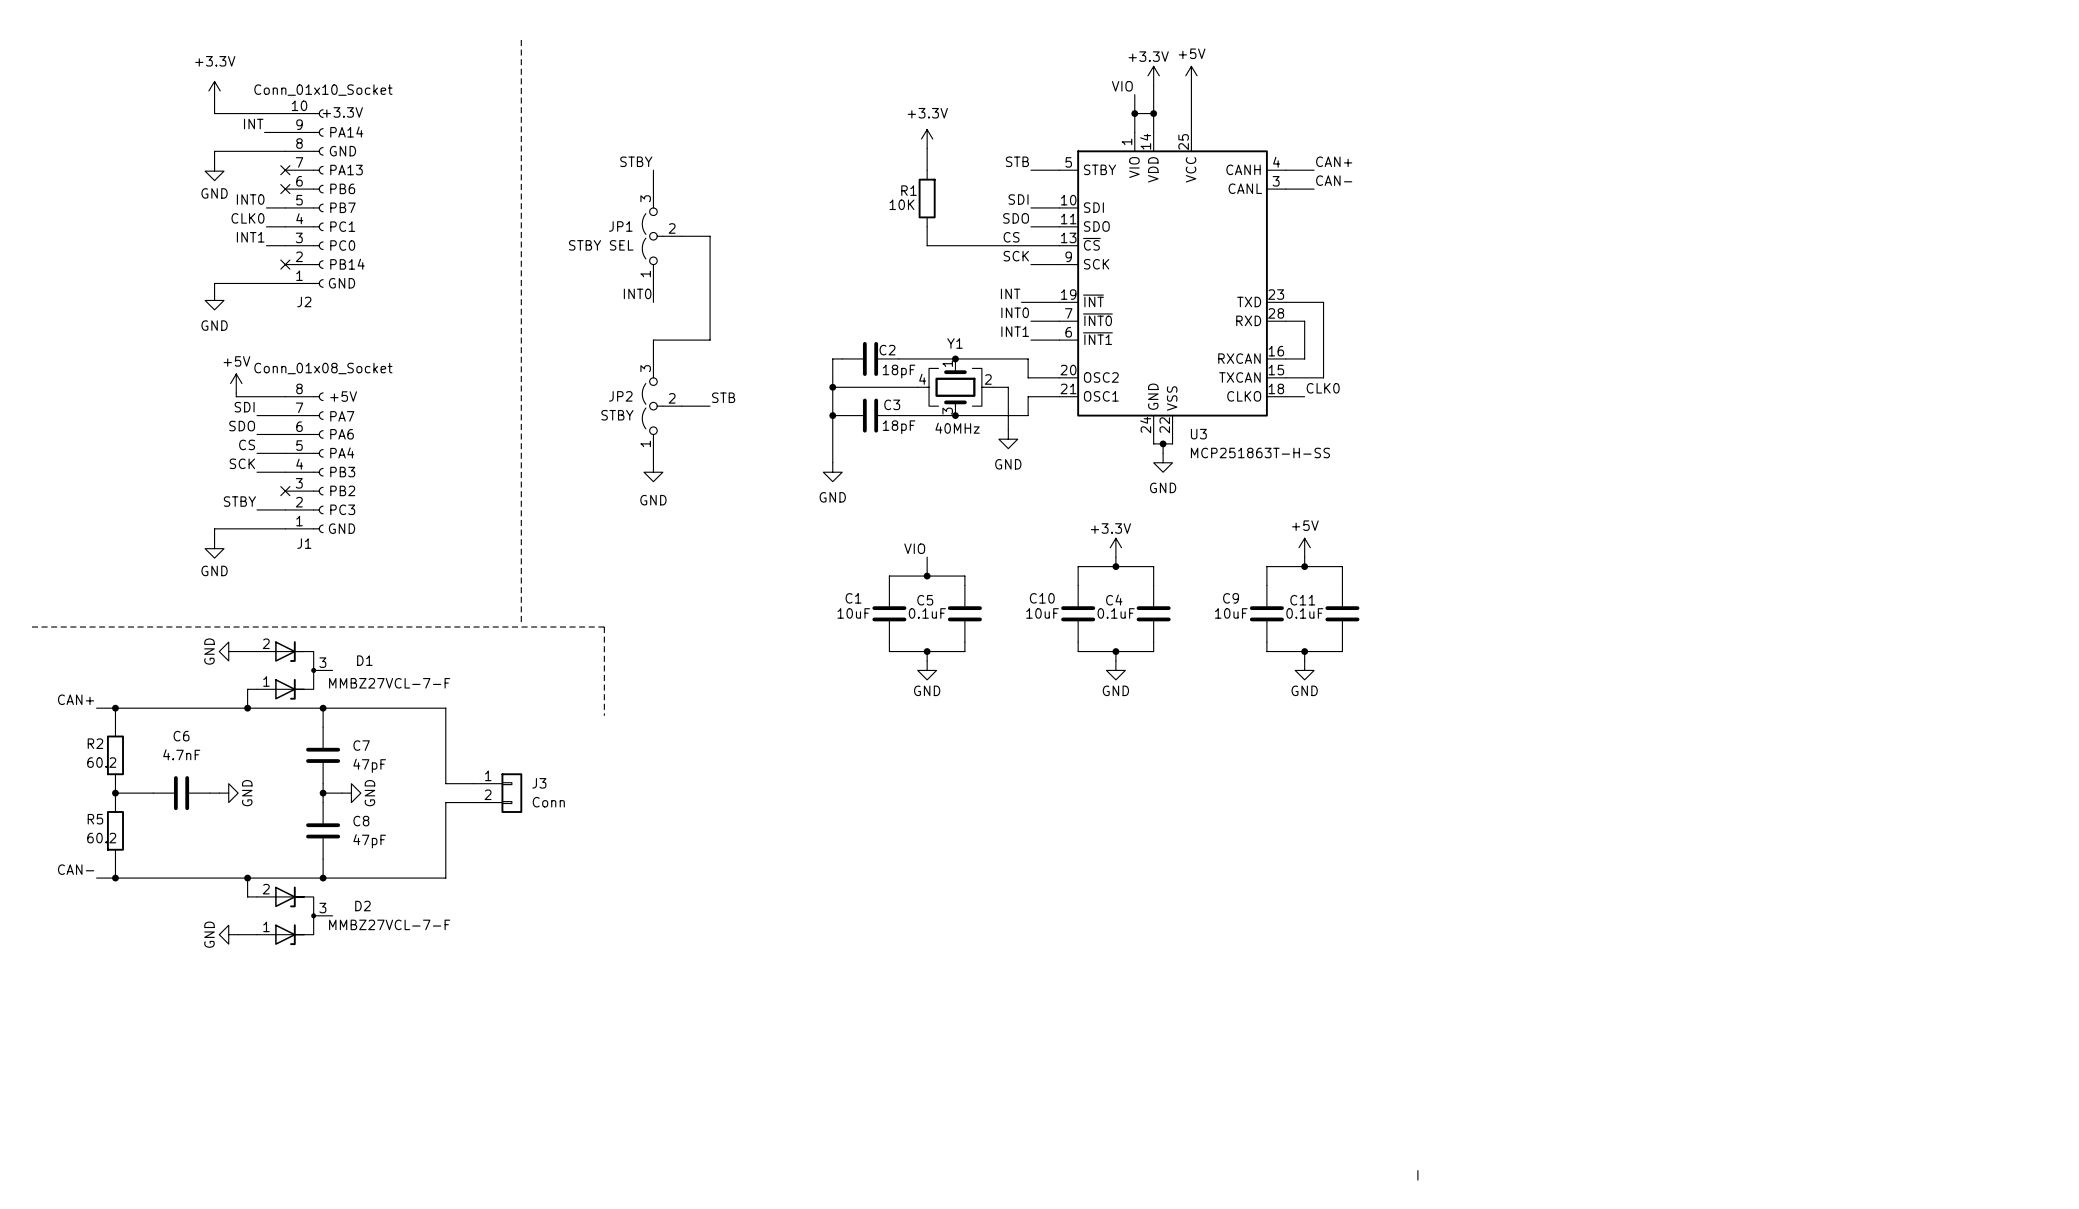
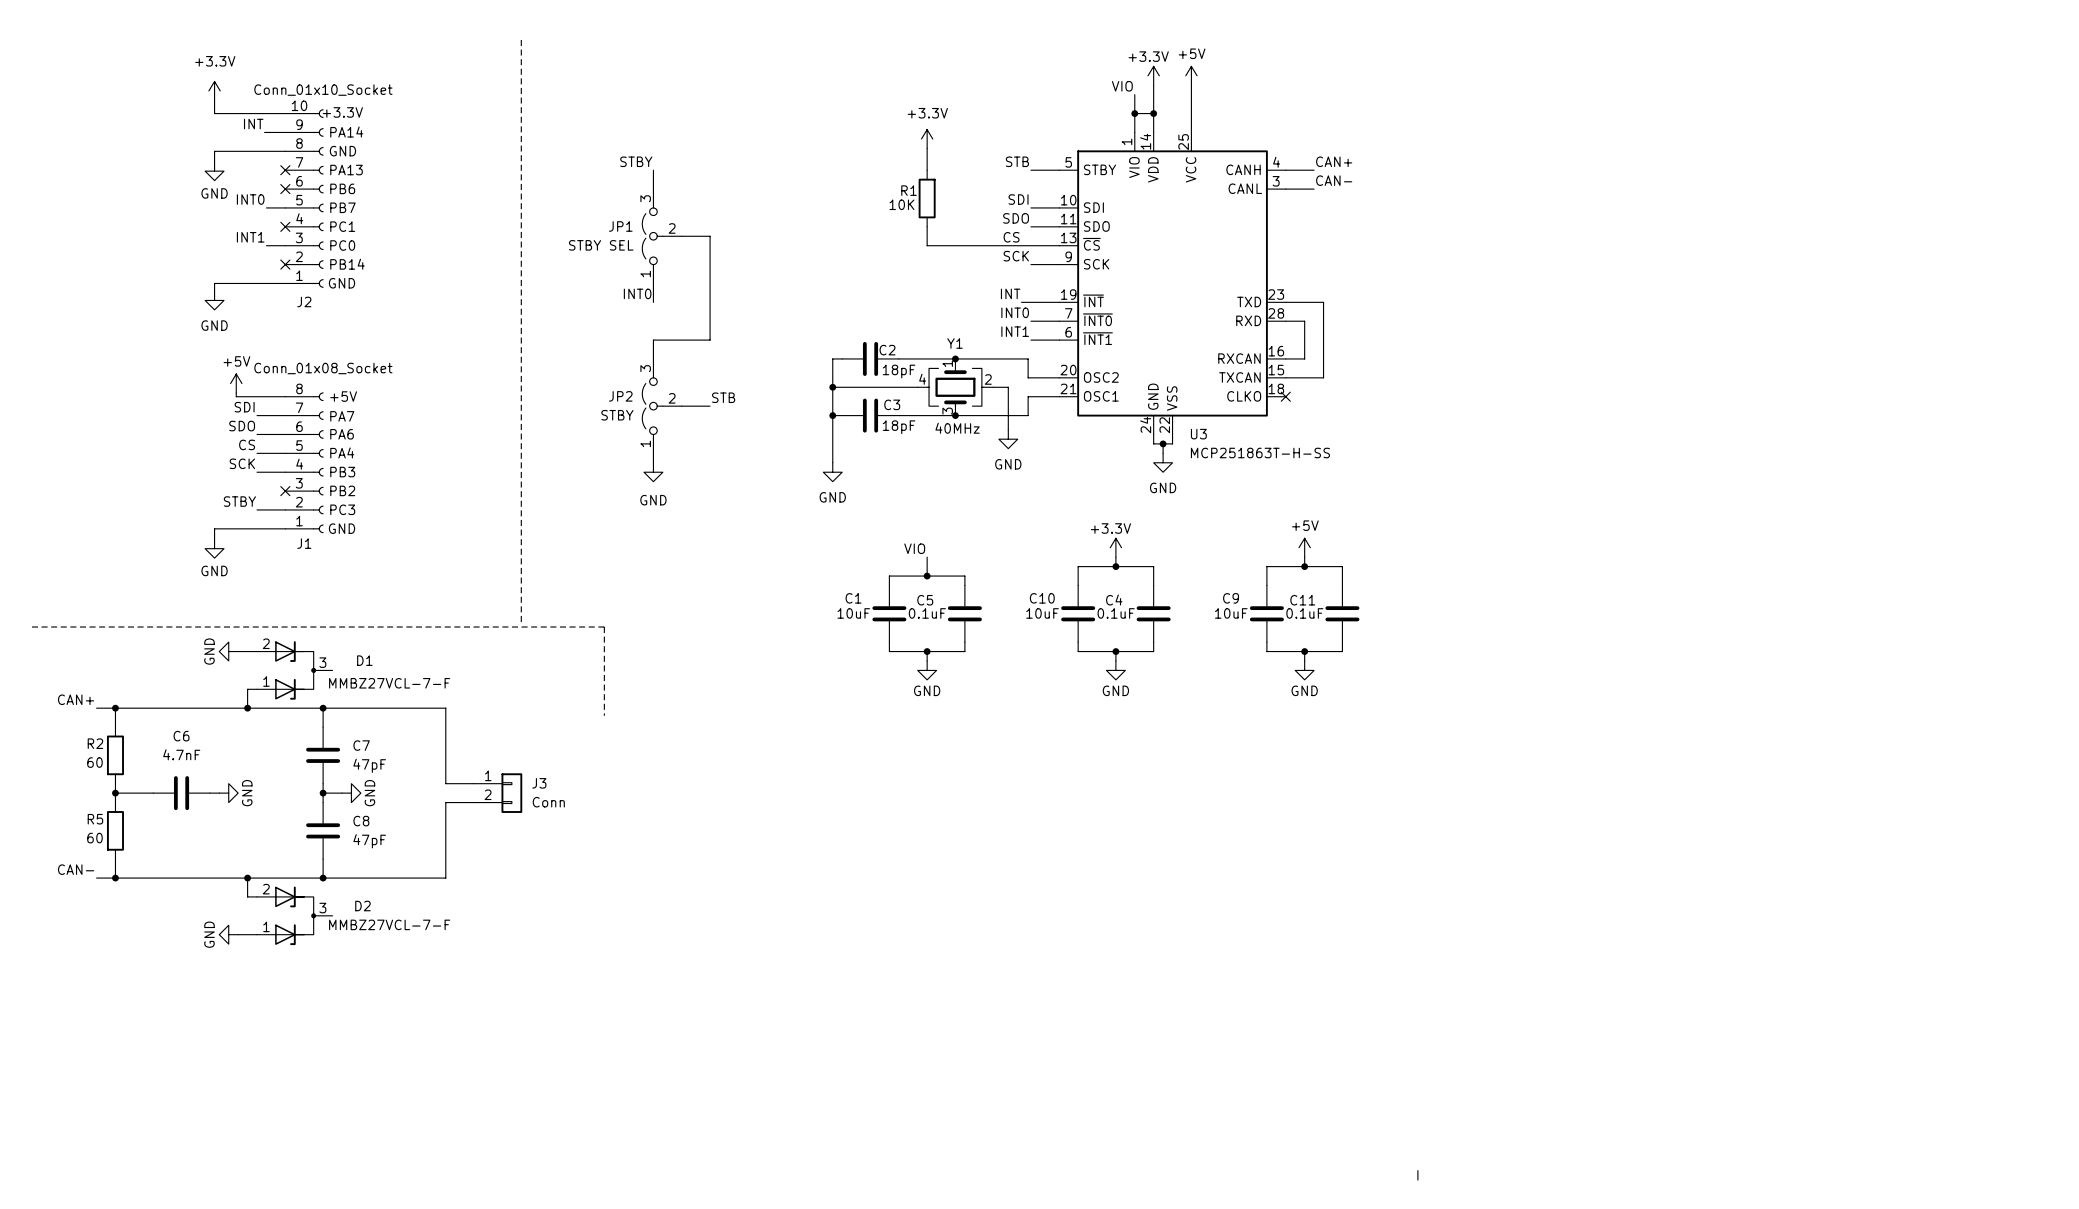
label: CLK0 (247, 218) -> none
wire: (266, 226) (285, 226) -> none
no-connect mark: none -> (285, 226)
label: CLK0 (1323, 388) -> none
wire: (1285, 396) (1304, 396) -> none
no-connect mark: none -> (1285, 396)
R2 value: 60.2 (101, 762) -> 60 (94, 762)
R5 value: 60.2 (101, 838) -> 60 (94, 838)

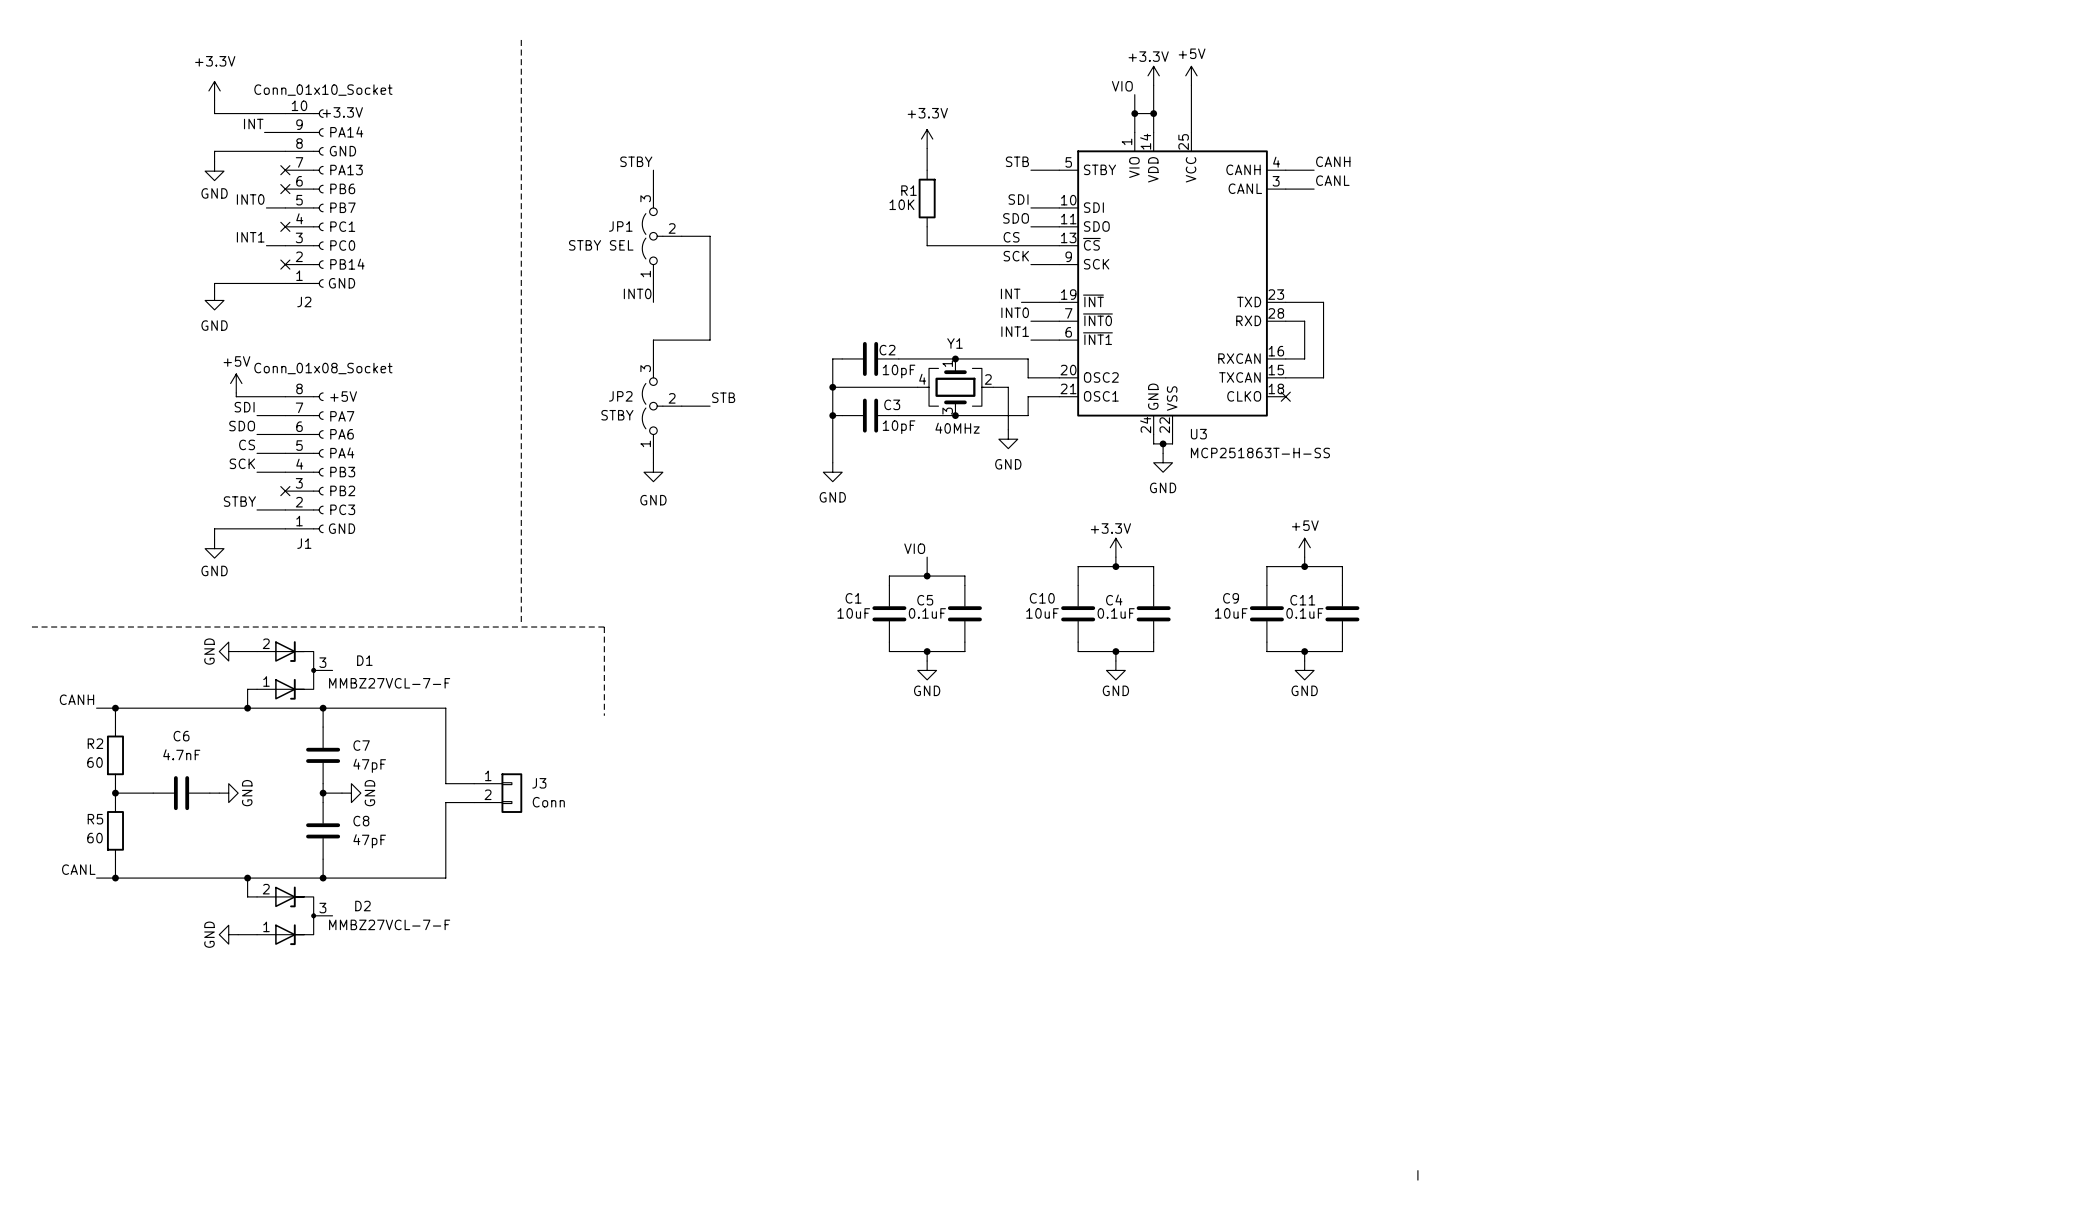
label: CAN+ (1334, 161) -> CANH (1333, 161)
label: CAN- (1334, 180) -> CANL (1332, 180)
C2 value: 18pF (899, 371) -> 10pF (899, 371)
C3 value: 18pF (899, 427) -> 10pF (899, 427)
label: CAN+ (76, 699) -> CANH (76, 699)
label: CAN- (76, 869) -> CANL (78, 869)

